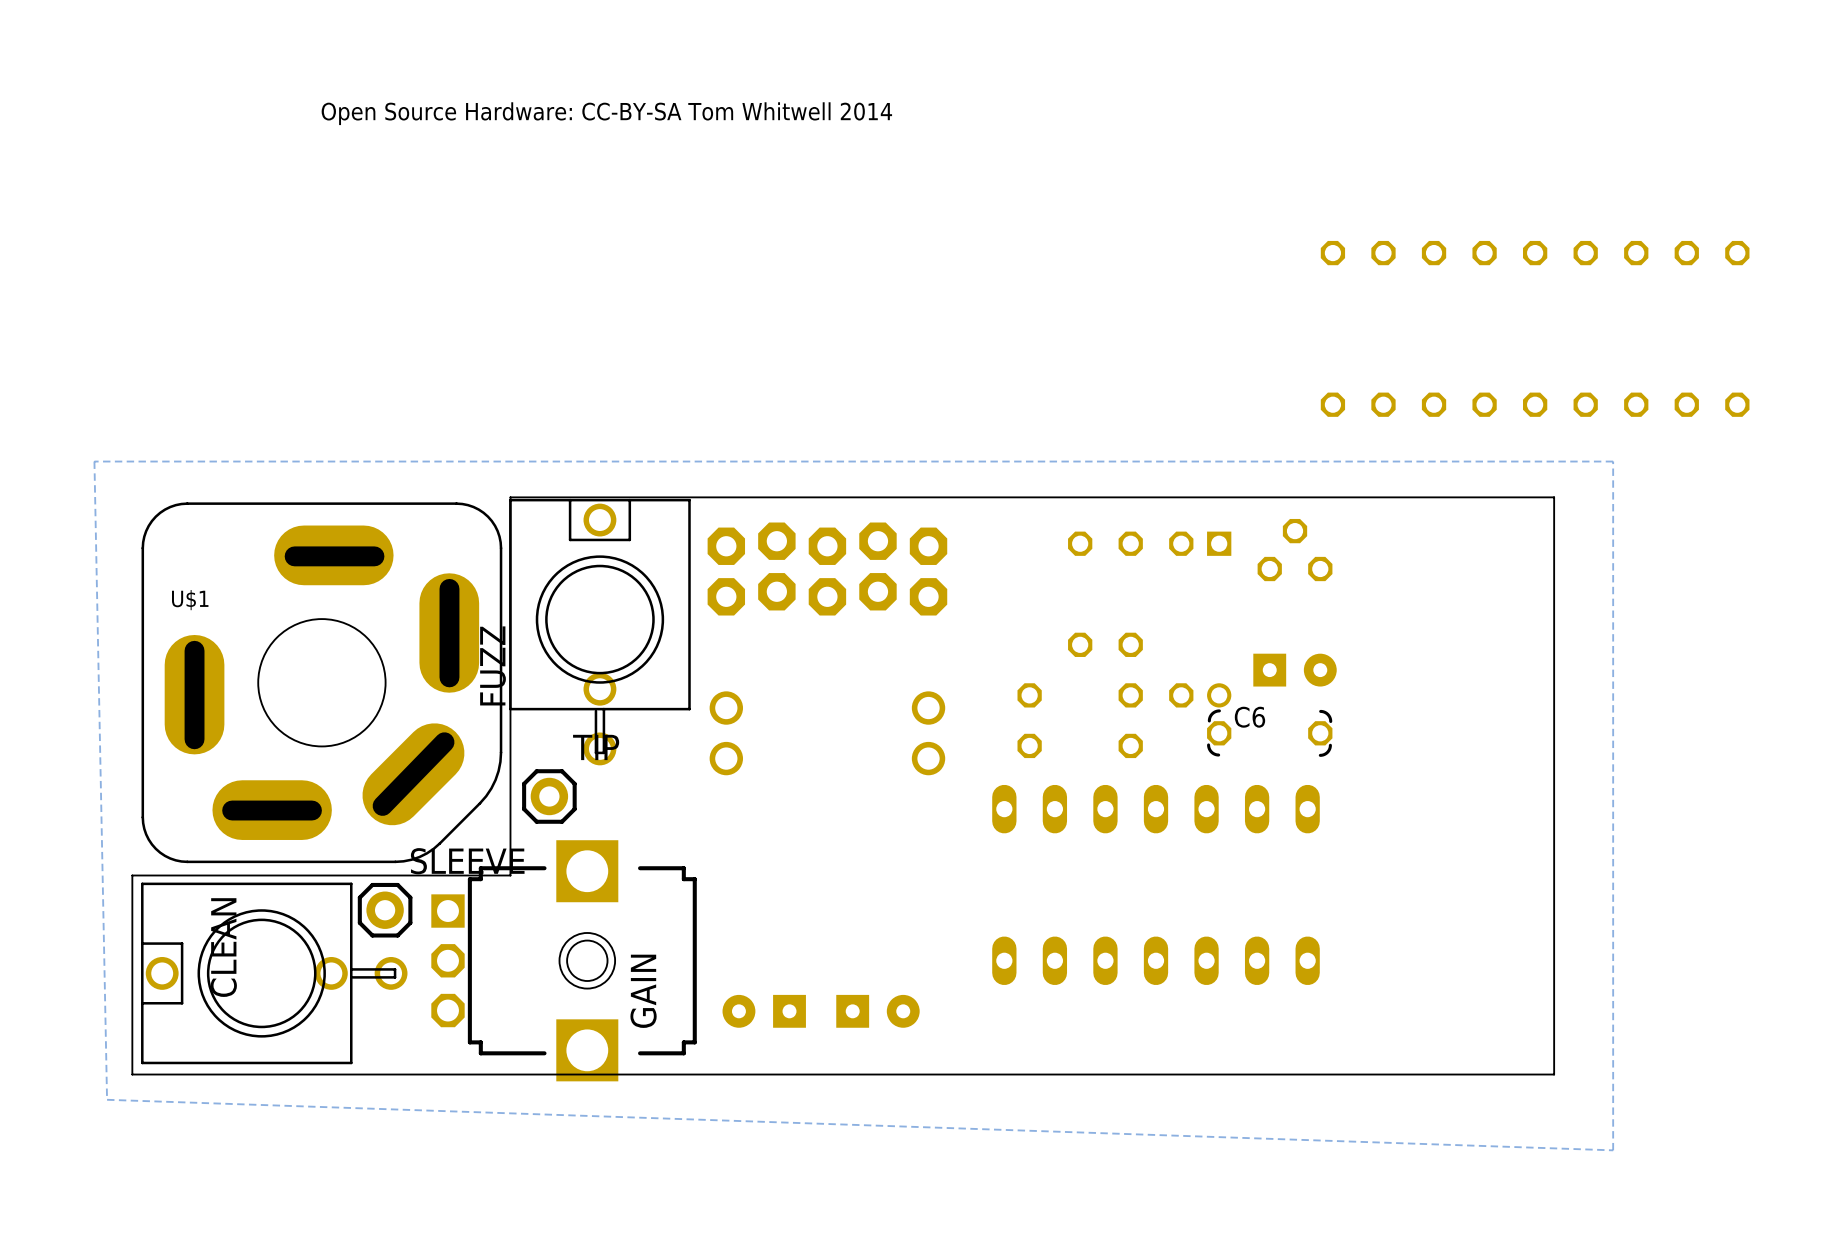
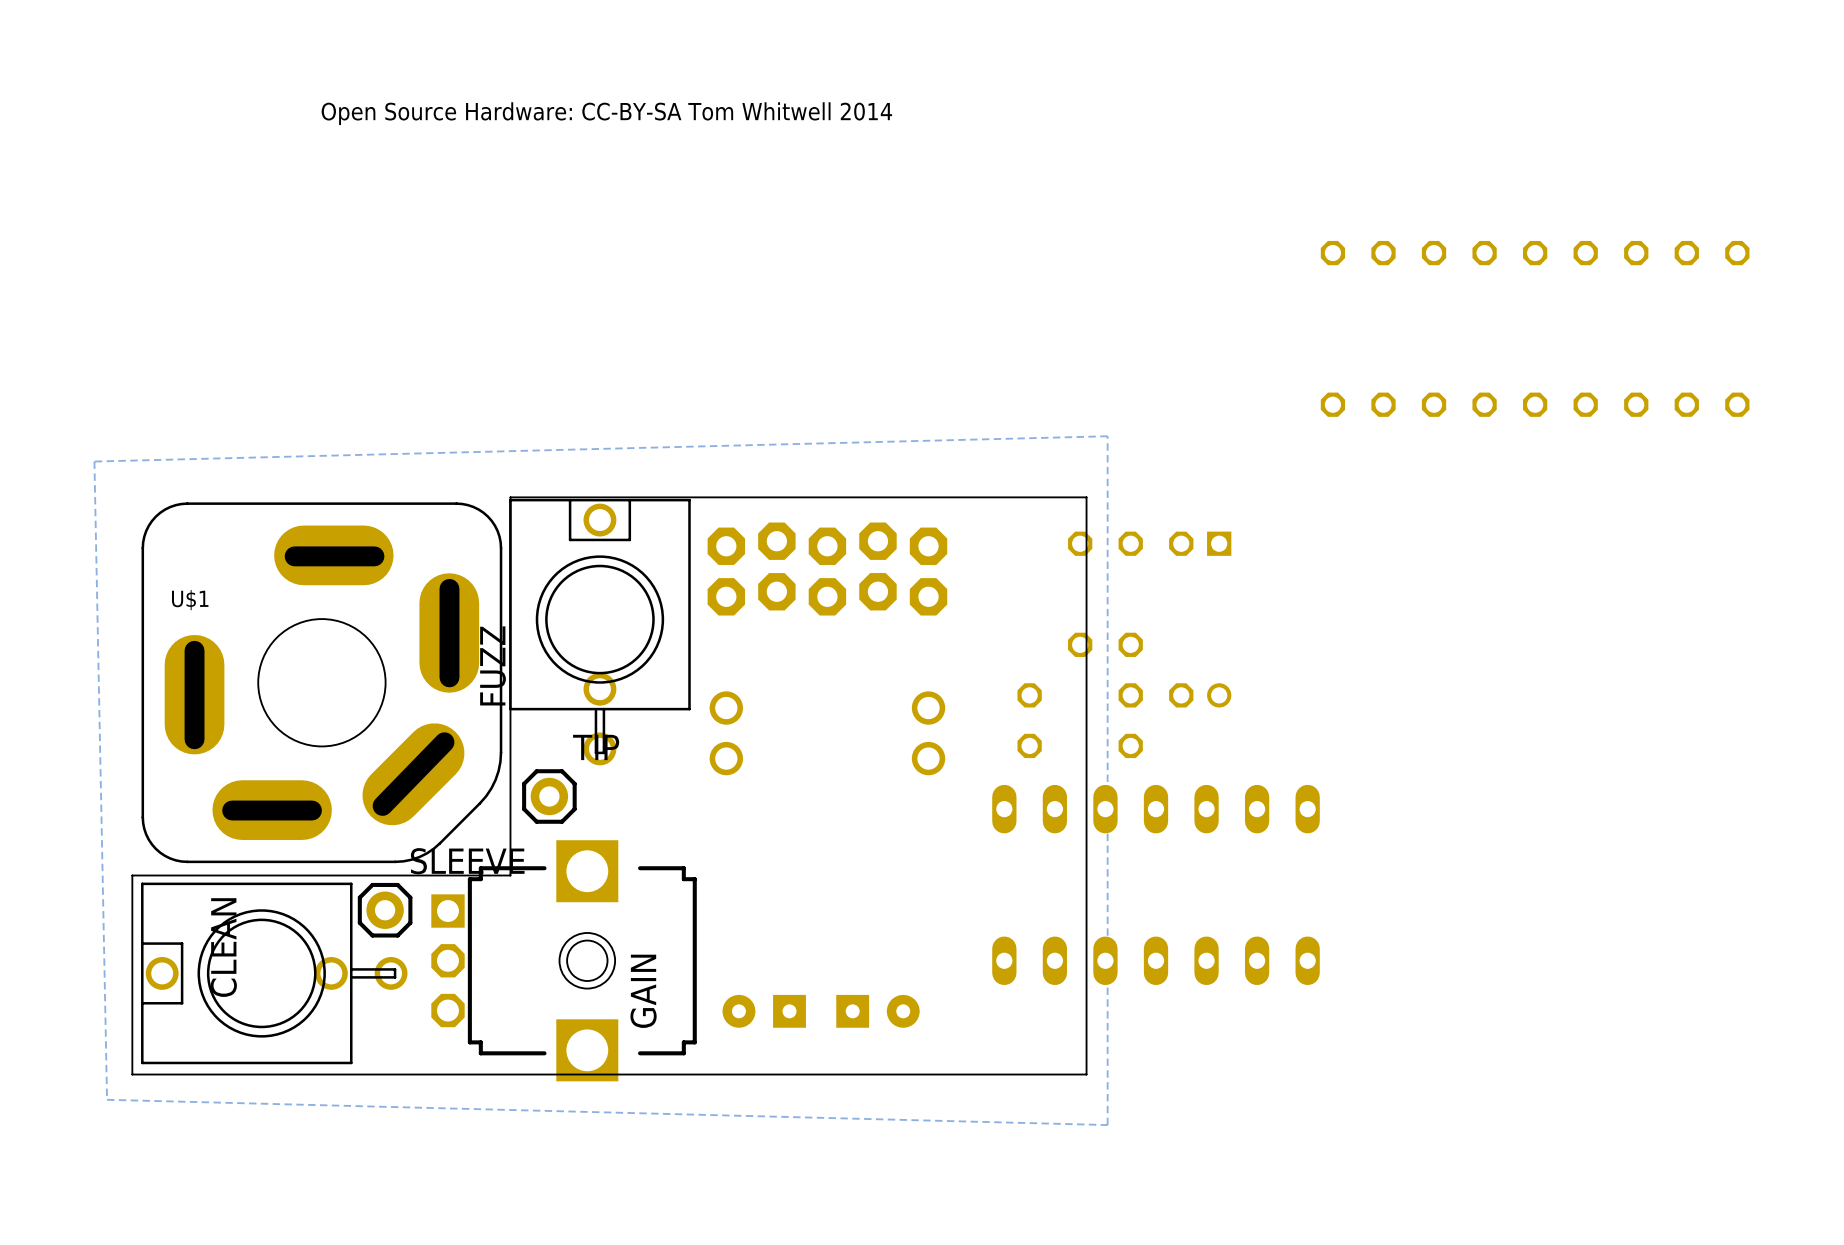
bottom zone outline: (94, 461) (1613, 461) (1613, 1150) (107, 1099) -> (94, 461) (1107, 436) (1107, 1125) (107, 1099)
board edge: (1086, 497) (1554, 497) (1554, 1074) (1086, 1074) -> (1086, 497) (1086, 1074)
part: (1295, 550) -> none
part: (1295, 670) -> none
C6: (1269, 733) -> none

